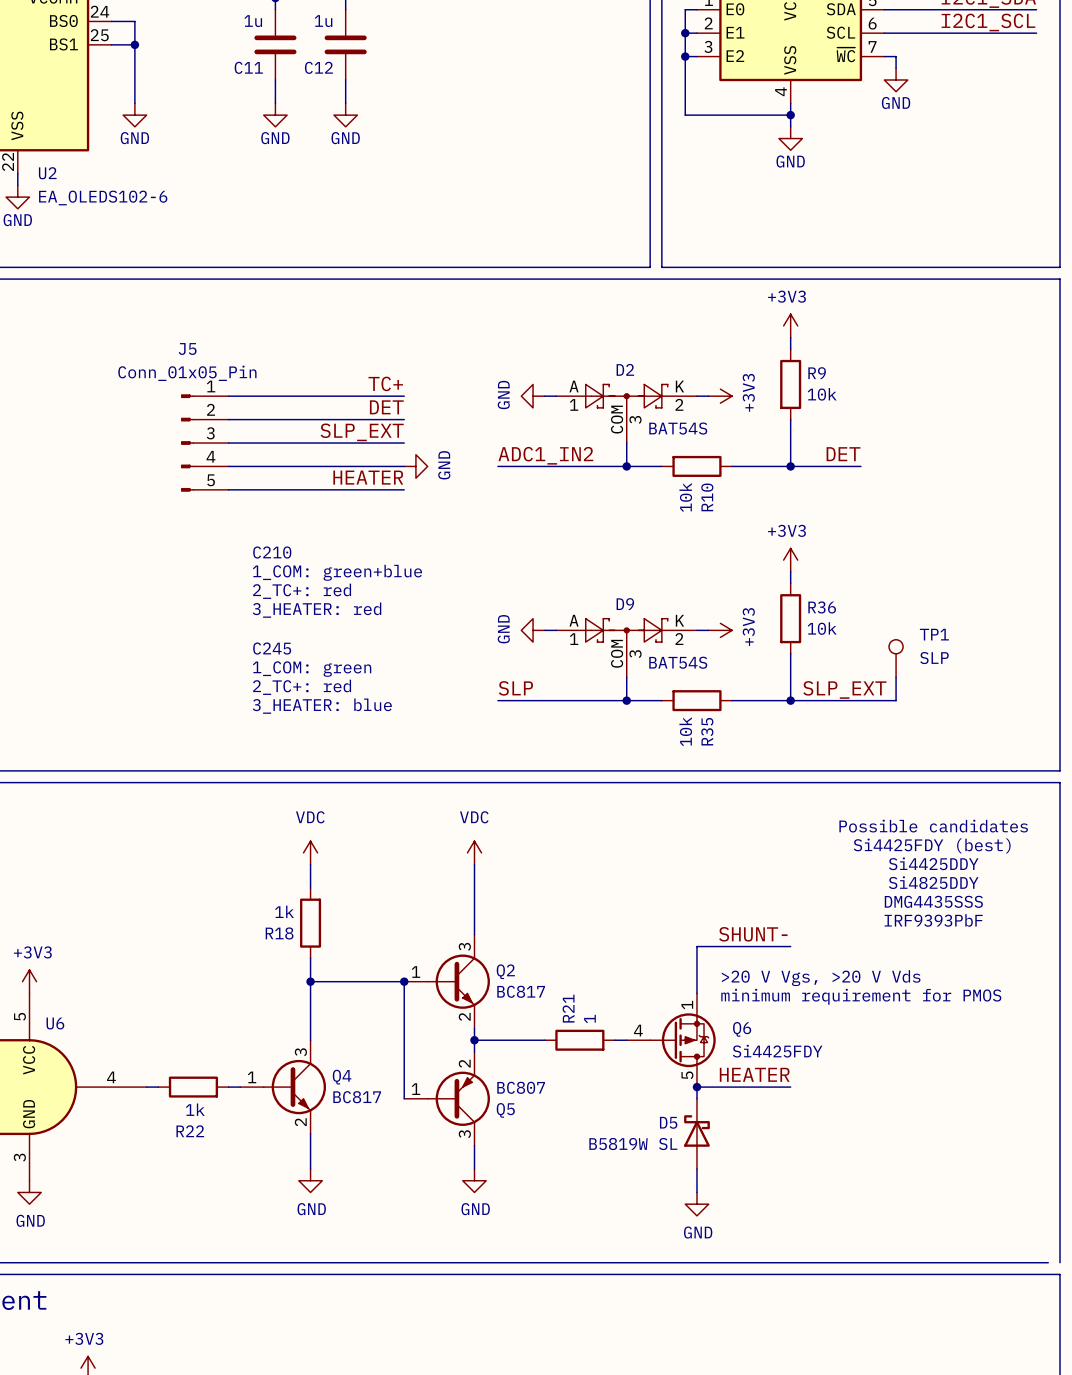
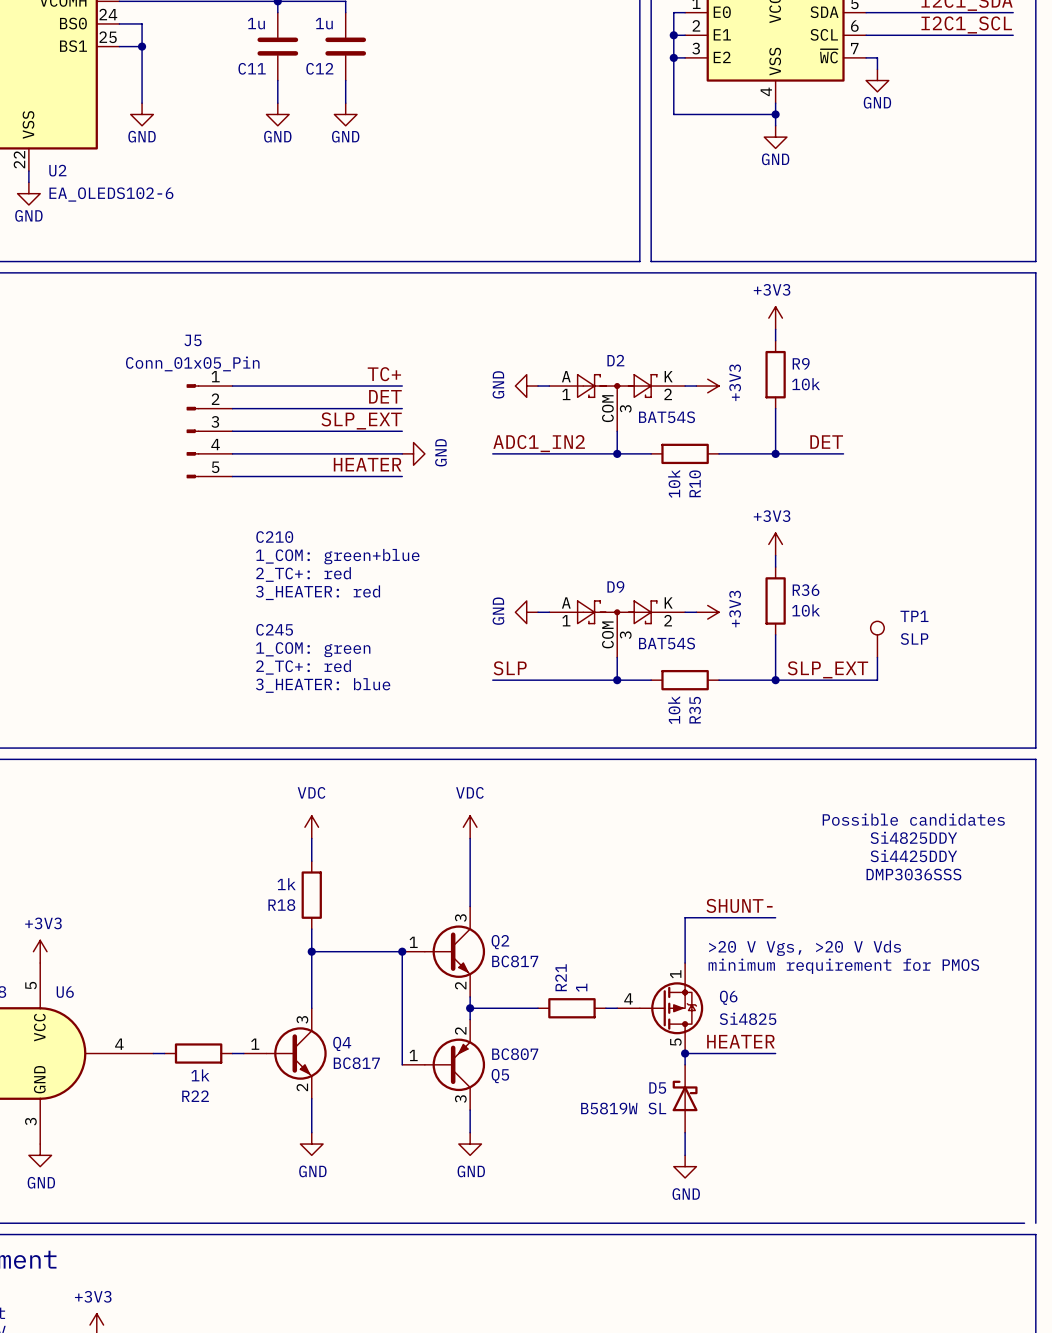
text: Possible candidates (933, 826) -> none
text: Si4425FDY (best) (932, 845) -> Possible candidates (913, 819)
text: Si4425DDY (933, 863) -> Si4825DDY (913, 837)
text: Si4825DDY (933, 882) -> Si4425DDY (913, 856)
text: DMG4435SSS (933, 901) -> DMP3036SSS (913, 874)
text: IRF9393PbF (933, 920) -> none
Q6 value: Si4425FDY (777, 1051) -> Si4825 (748, 1018)

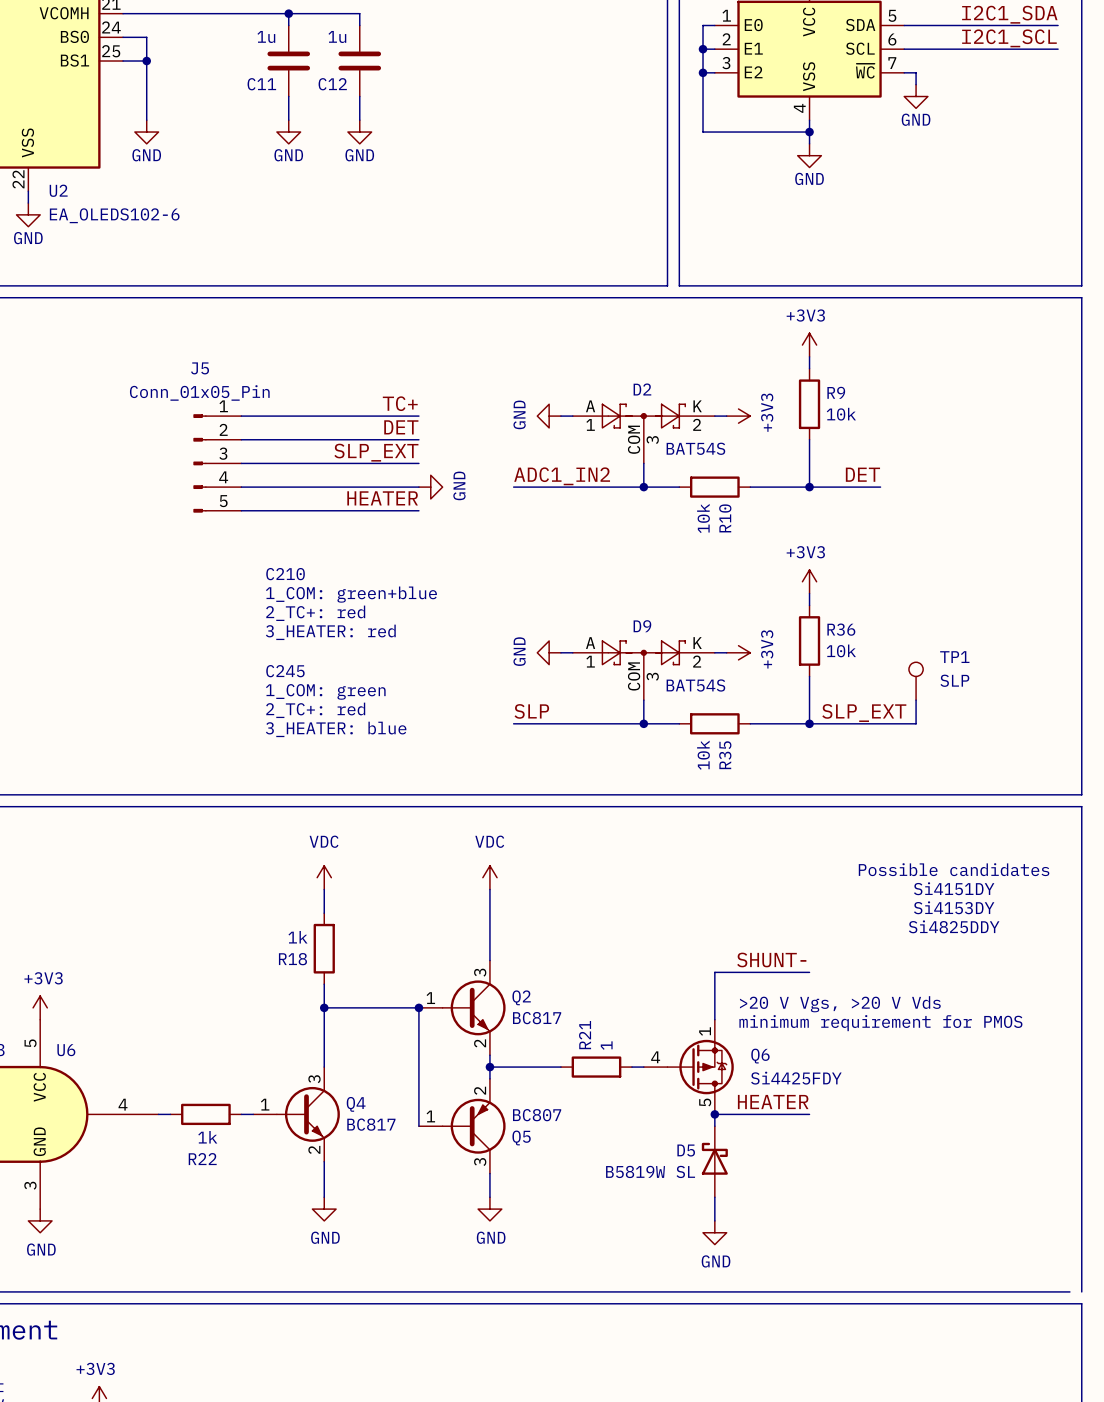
text: Si4825DDY (913, 837) -> Si4151DY (954, 888)
text: Si4425DDY (913, 856) -> Si4153DY (954, 907)
text: DMP3036SSS (913, 874) -> Si4825DDY (954, 926)
Q6 value: Si4825 (748, 1018) -> Si4425FDY (796, 1078)

